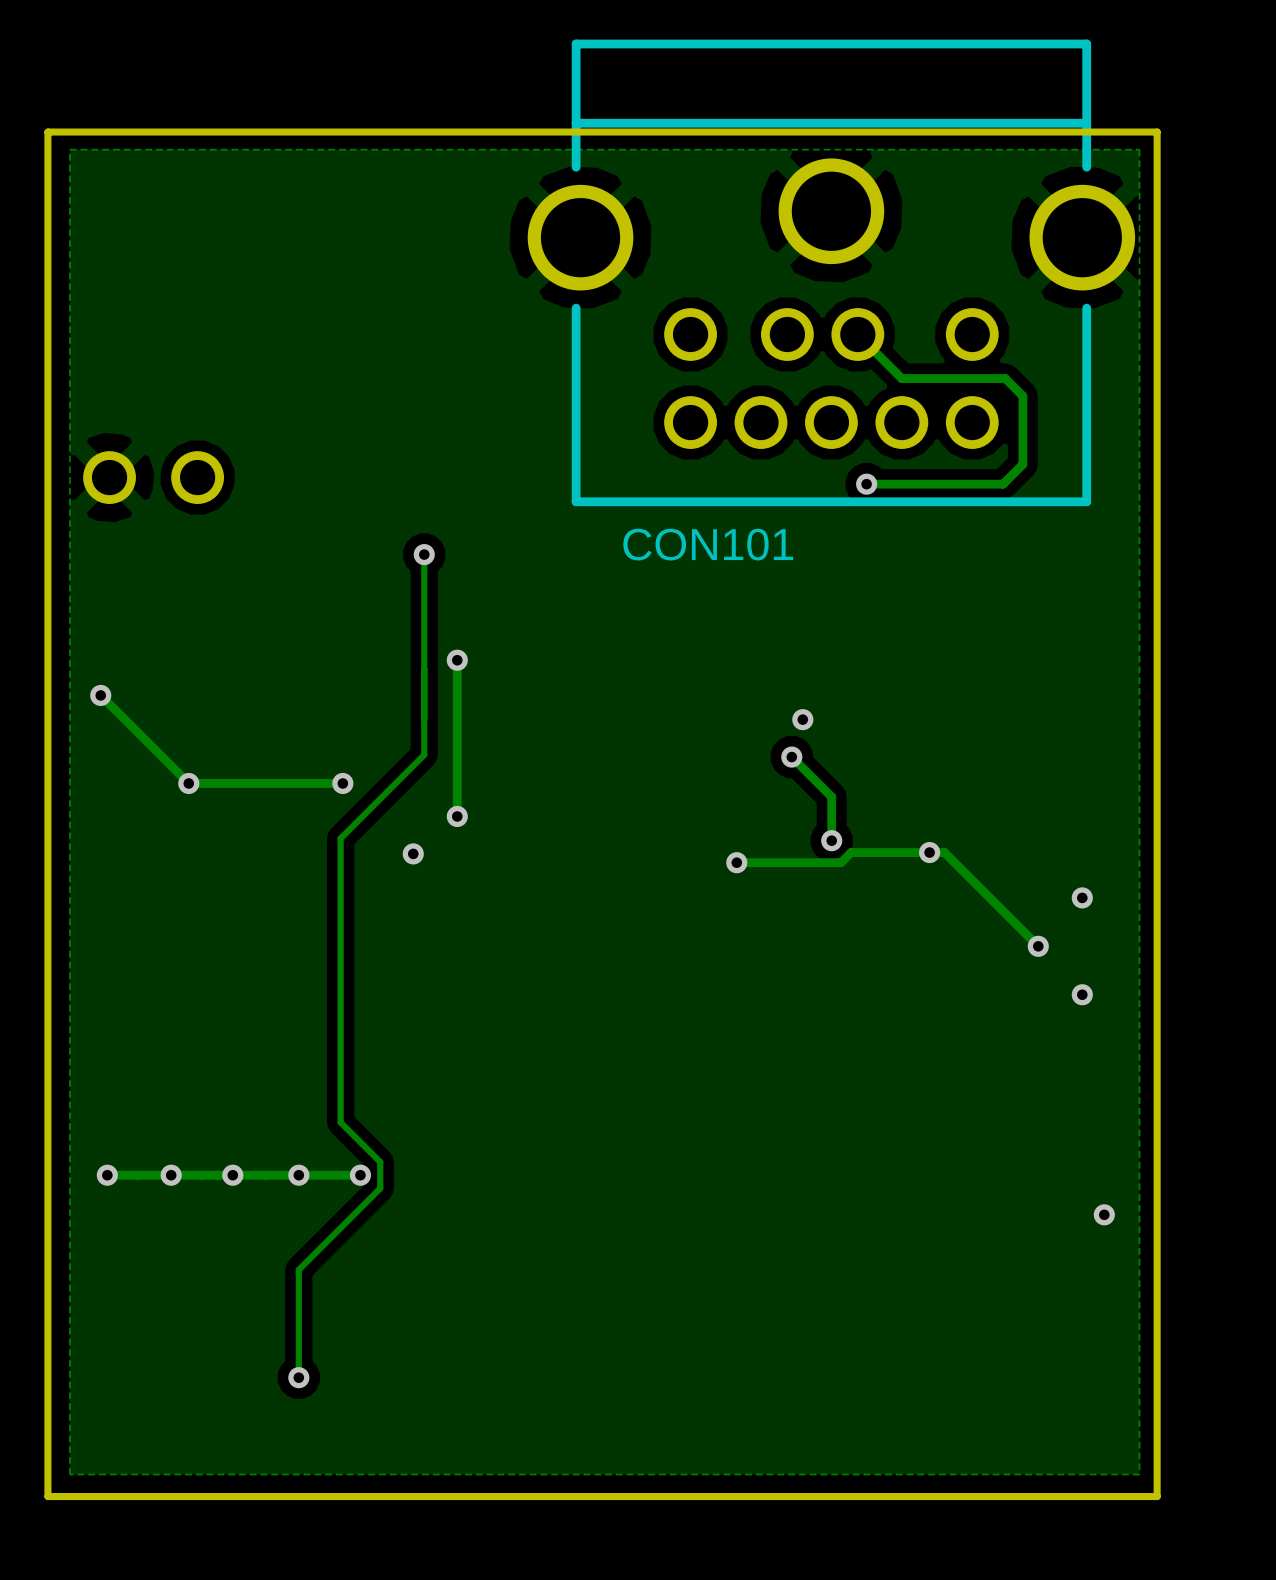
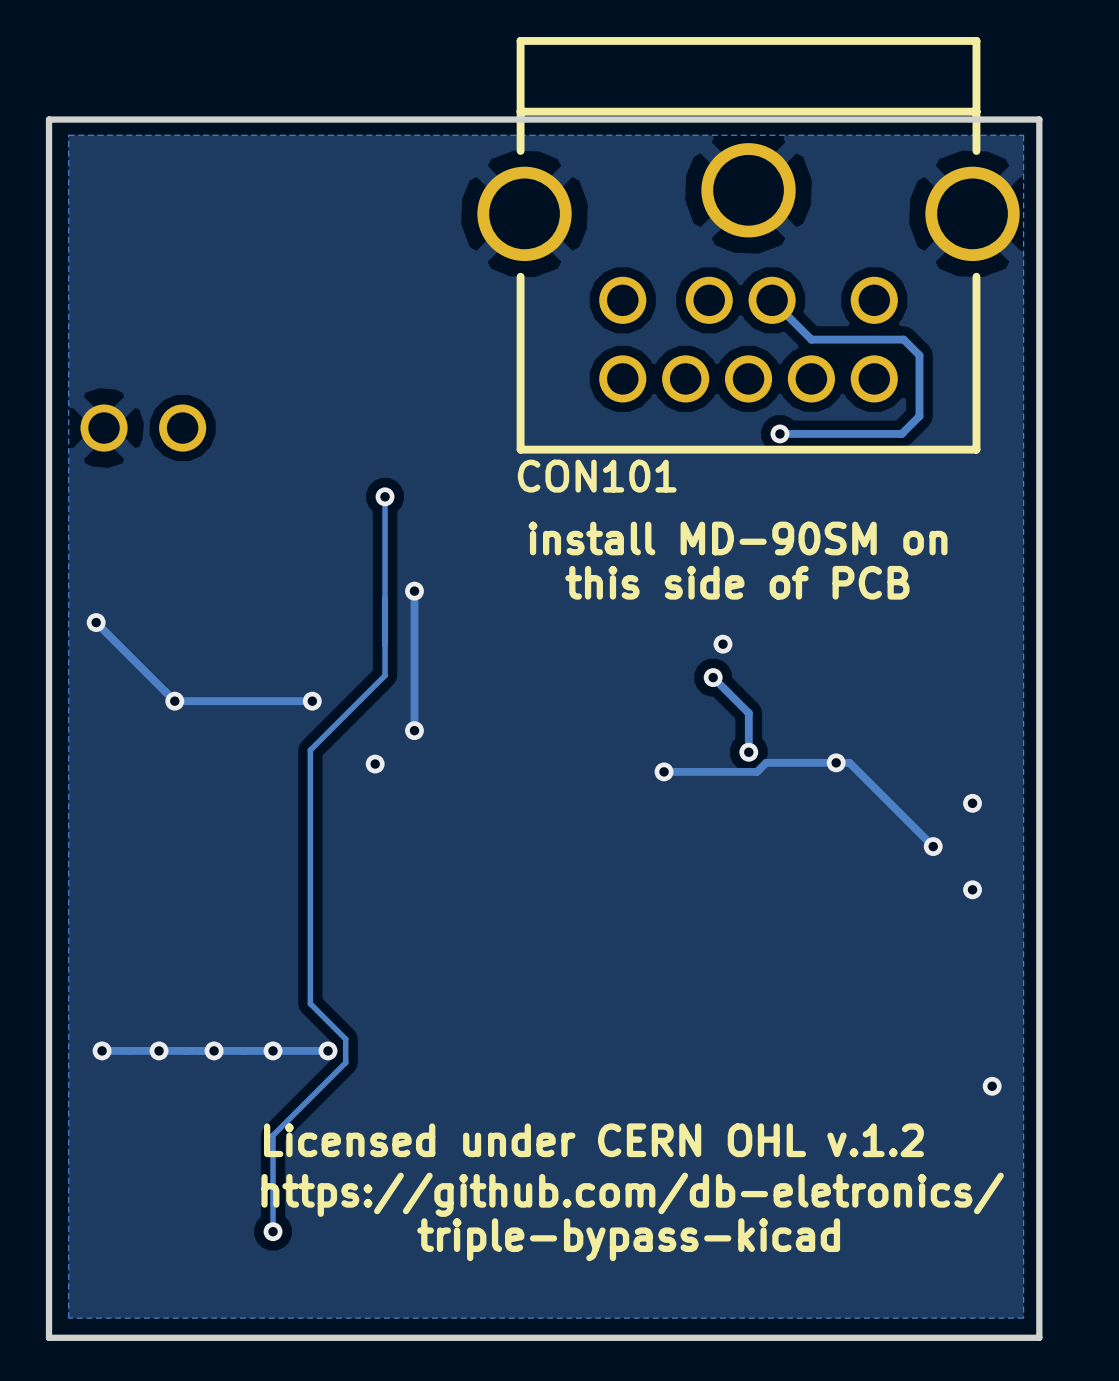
CON101 name position: CON101 (708, 544) -> CON101 (597, 476)
text: none -> install MD-90SM on (738, 538)
text: none -> this side of PCB (737, 582)
text: none -> Licensed under CERN OHL v.1.2 (593, 1140)
text: none -> https://github.com/db-eletronics/ (632, 1194)
text: none -> triple-bypass-kicad (628, 1239)

